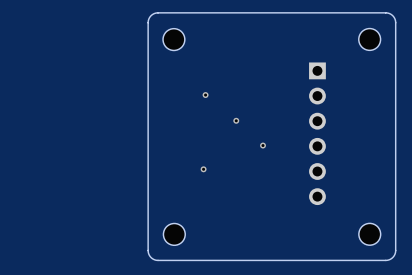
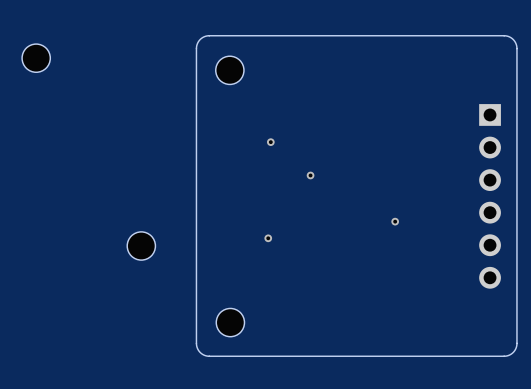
part: none -> (36, 58)
part: (369, 39) -> none
part position: (317, 133) -> (490, 196)
via position: (263, 145) -> (395, 221)
part: none -> (141, 246)
part: (369, 234) -> none

